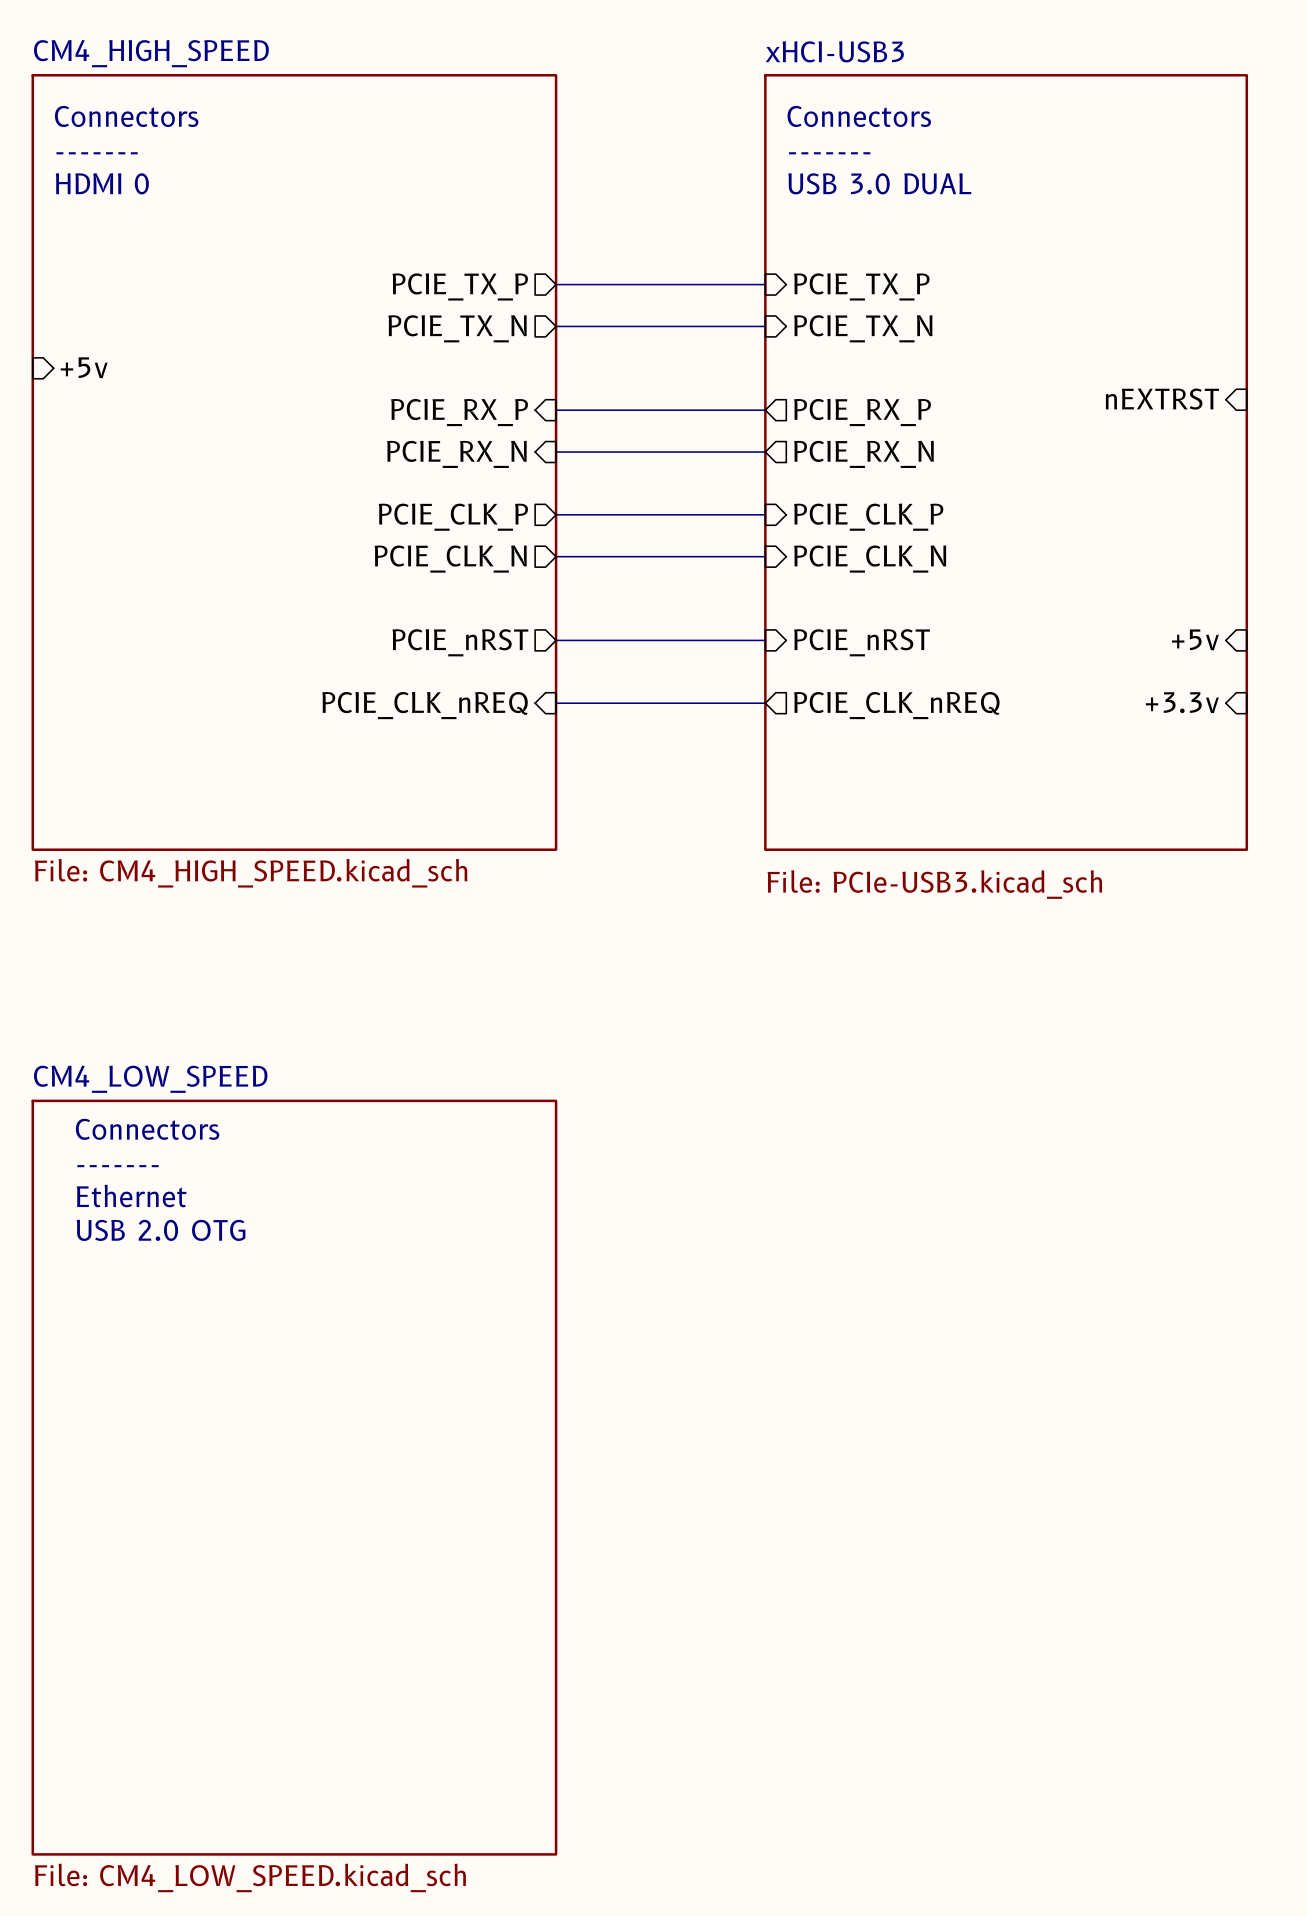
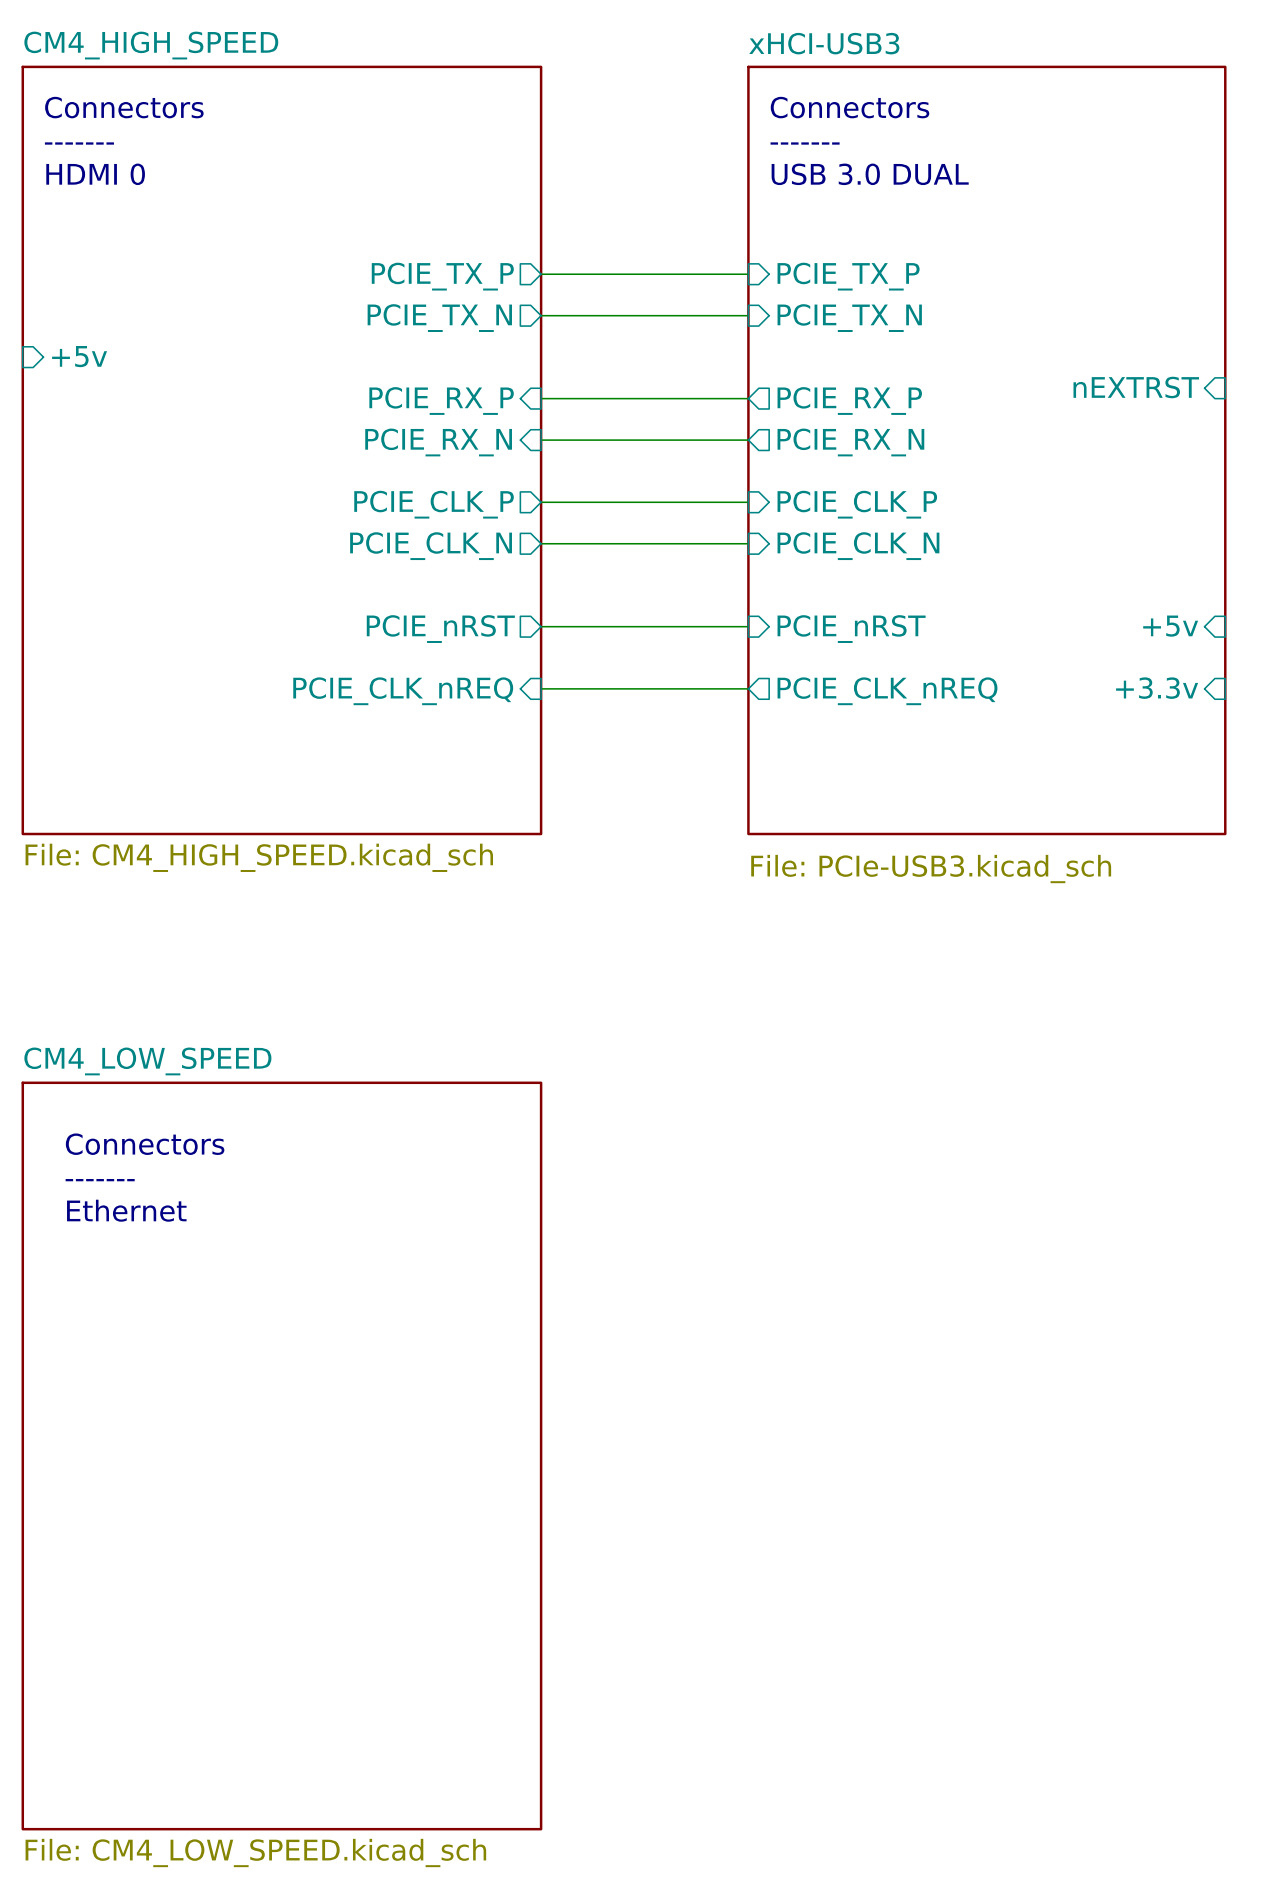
text: Connectors (147, 1129) -> none
text: ------- (118, 1166) -> Connectors (145, 1144)
text: Ethernet (131, 1195) -> ------- (100, 1180)
text: USB 2.0 OTG (161, 1230) -> Ethernet (126, 1210)

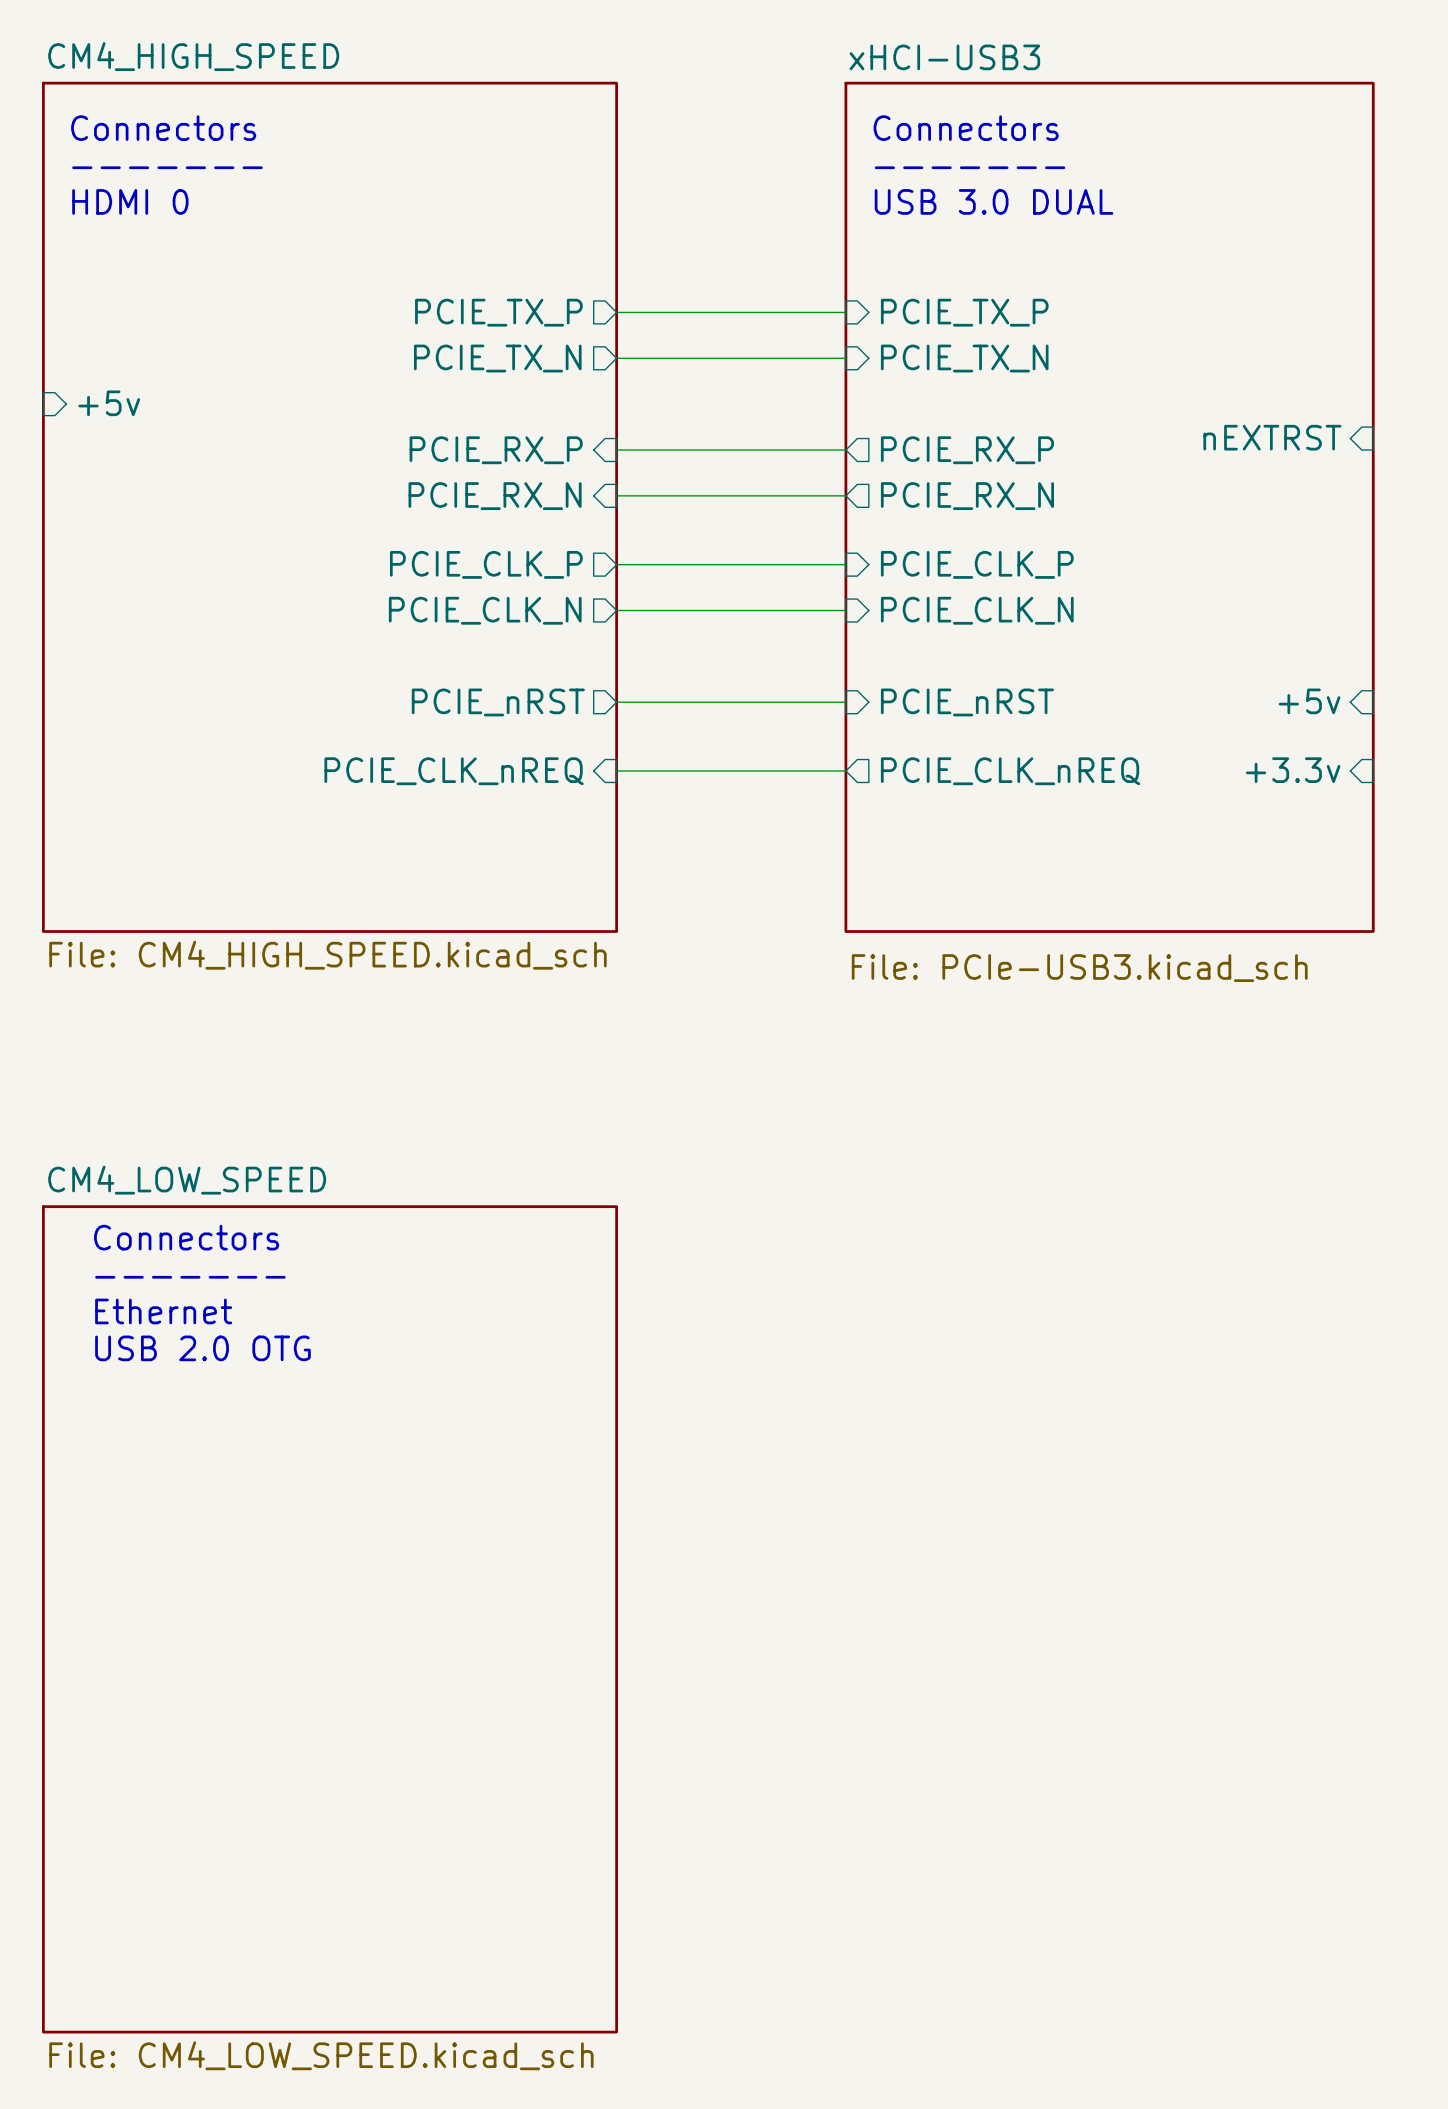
text: none -> Connectors (186, 1237)
text: Connectors (145, 1144) -> ------- (190, 1277)
text: ------- (100, 1180) -> Ethernet (163, 1311)
text: Ethernet (126, 1210) -> USB 2.0 OTG (202, 1348)

